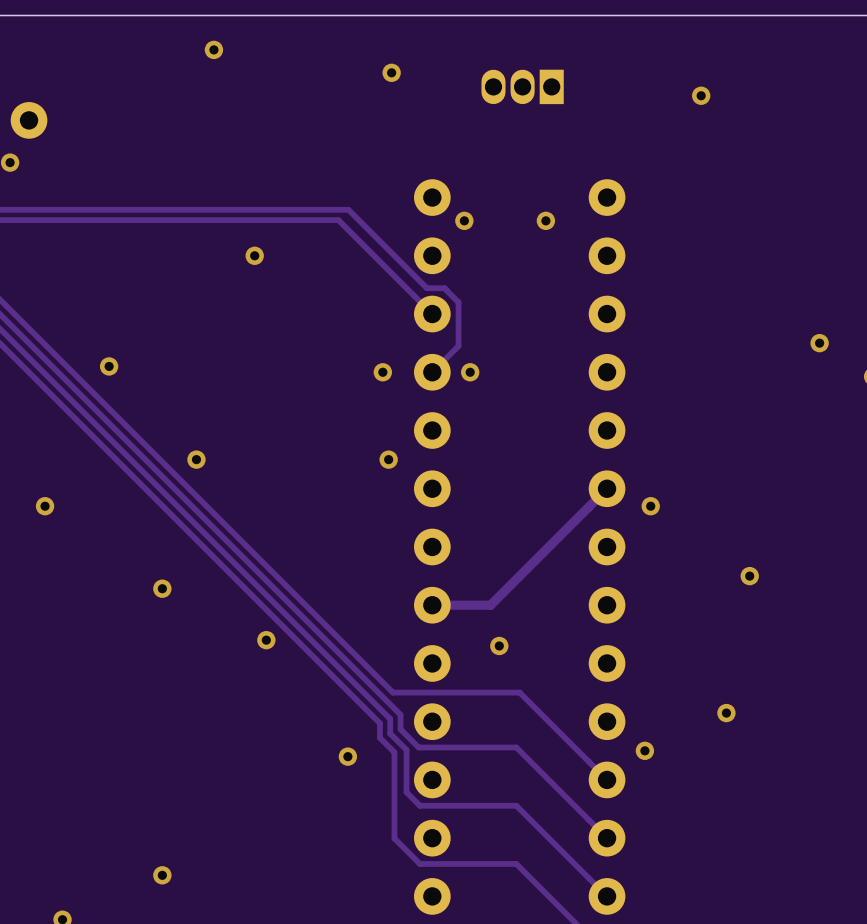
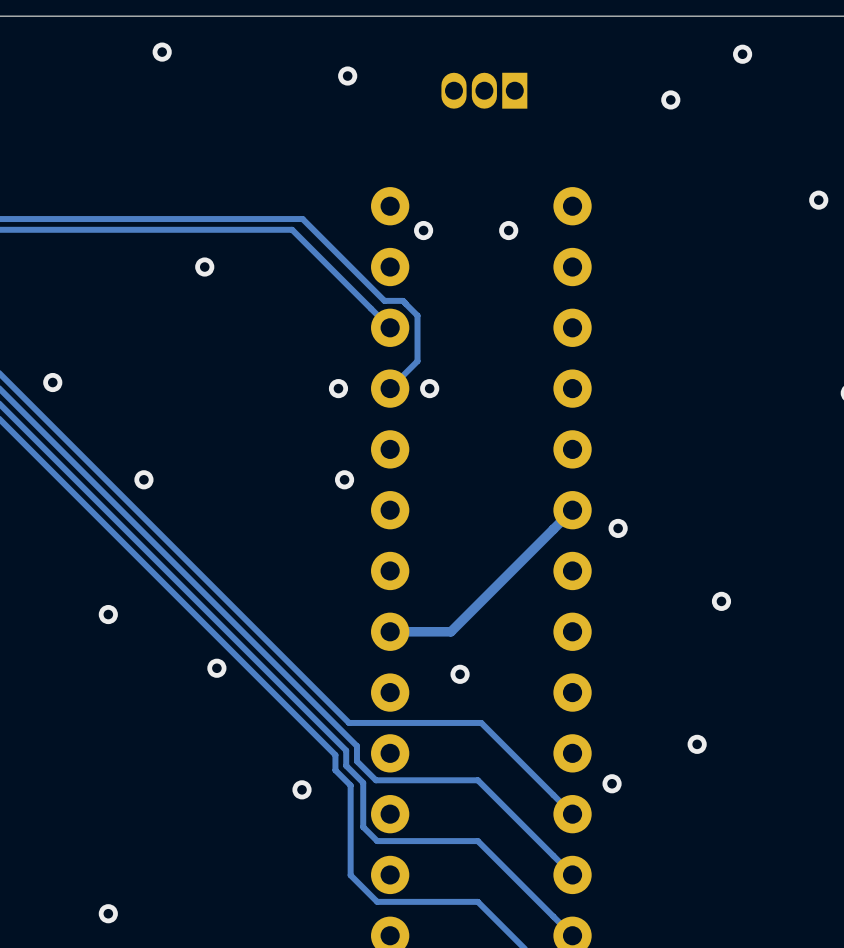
via: none -> (742, 54)
via: none -> (818, 200)
via: (819, 343) -> none

